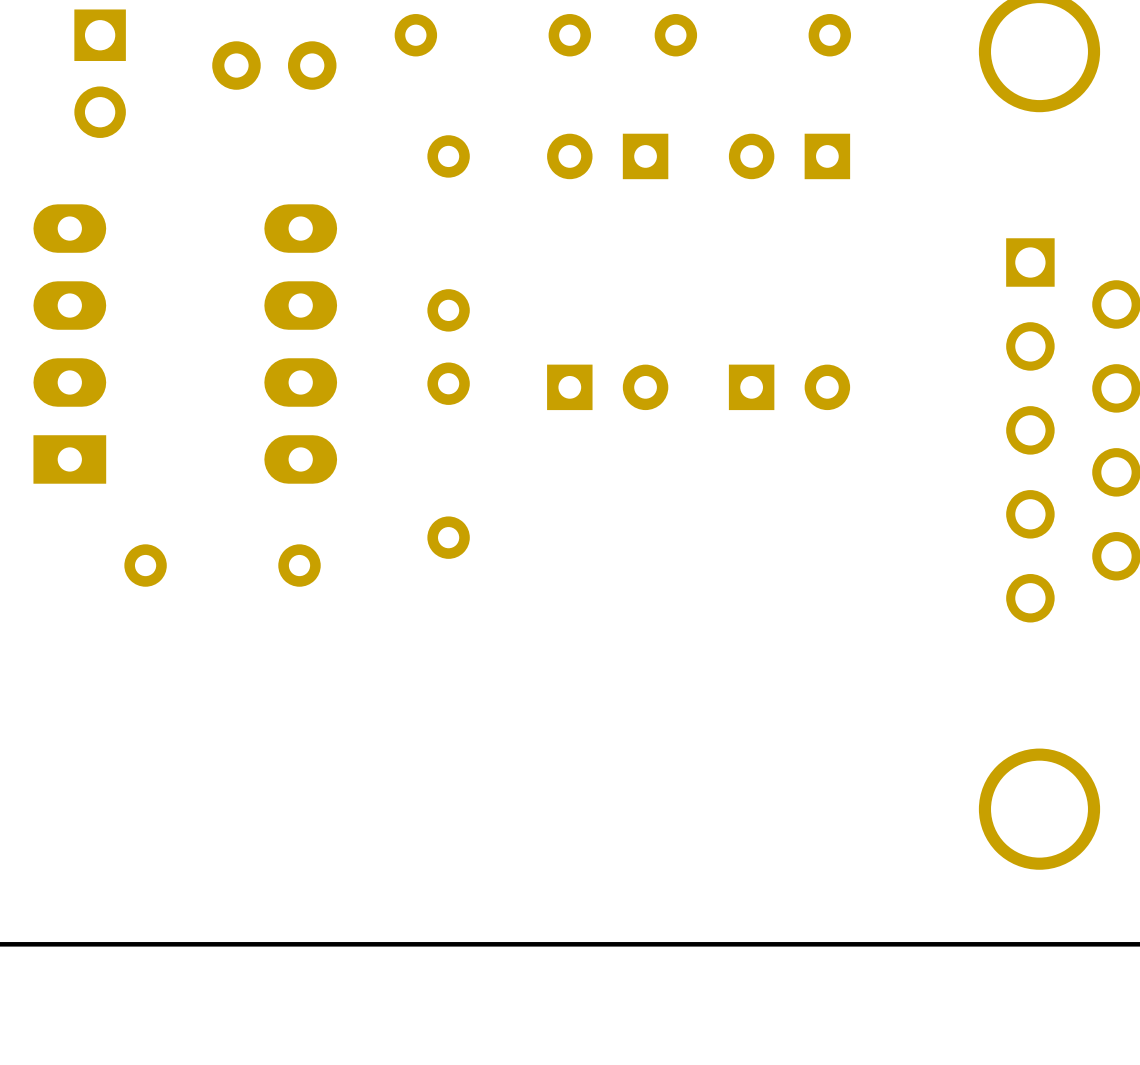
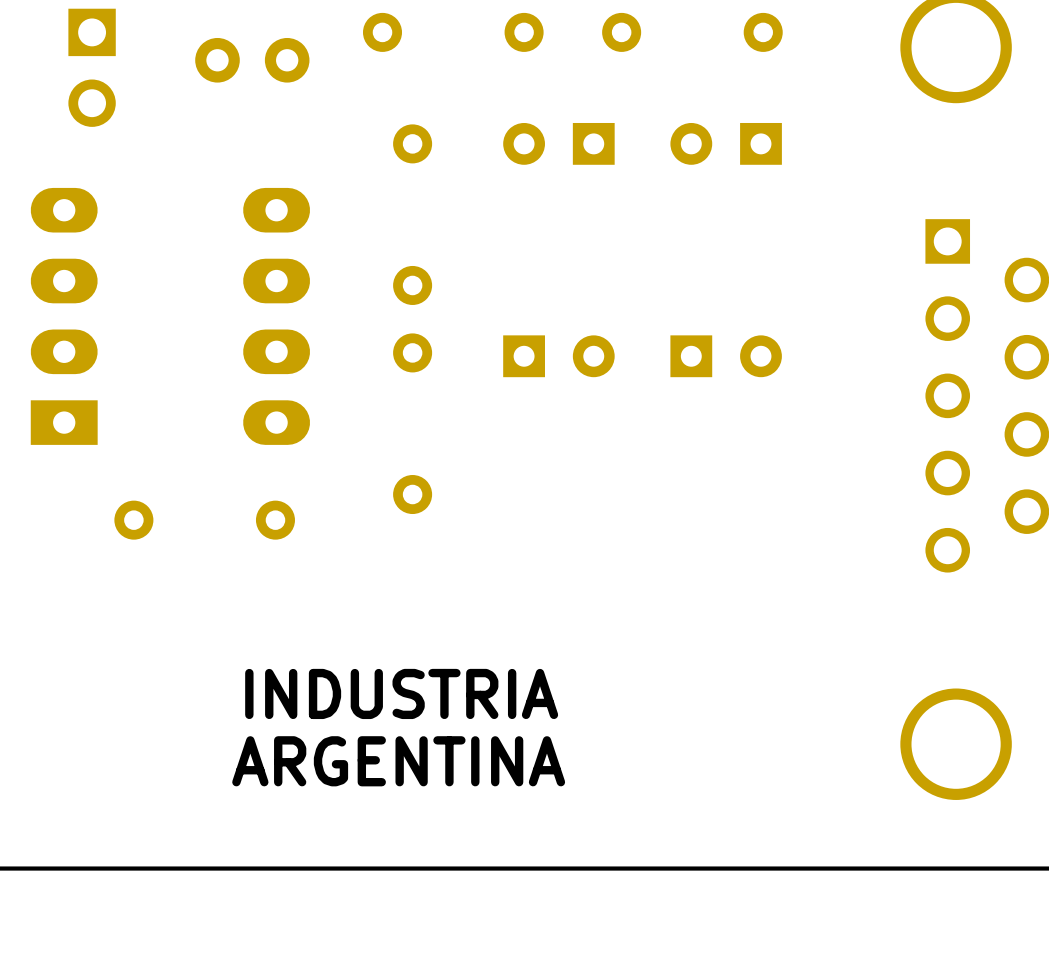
text: none -> INDUSTRIA (401, 693)
text: none -> ARGENTINA (398, 761)

